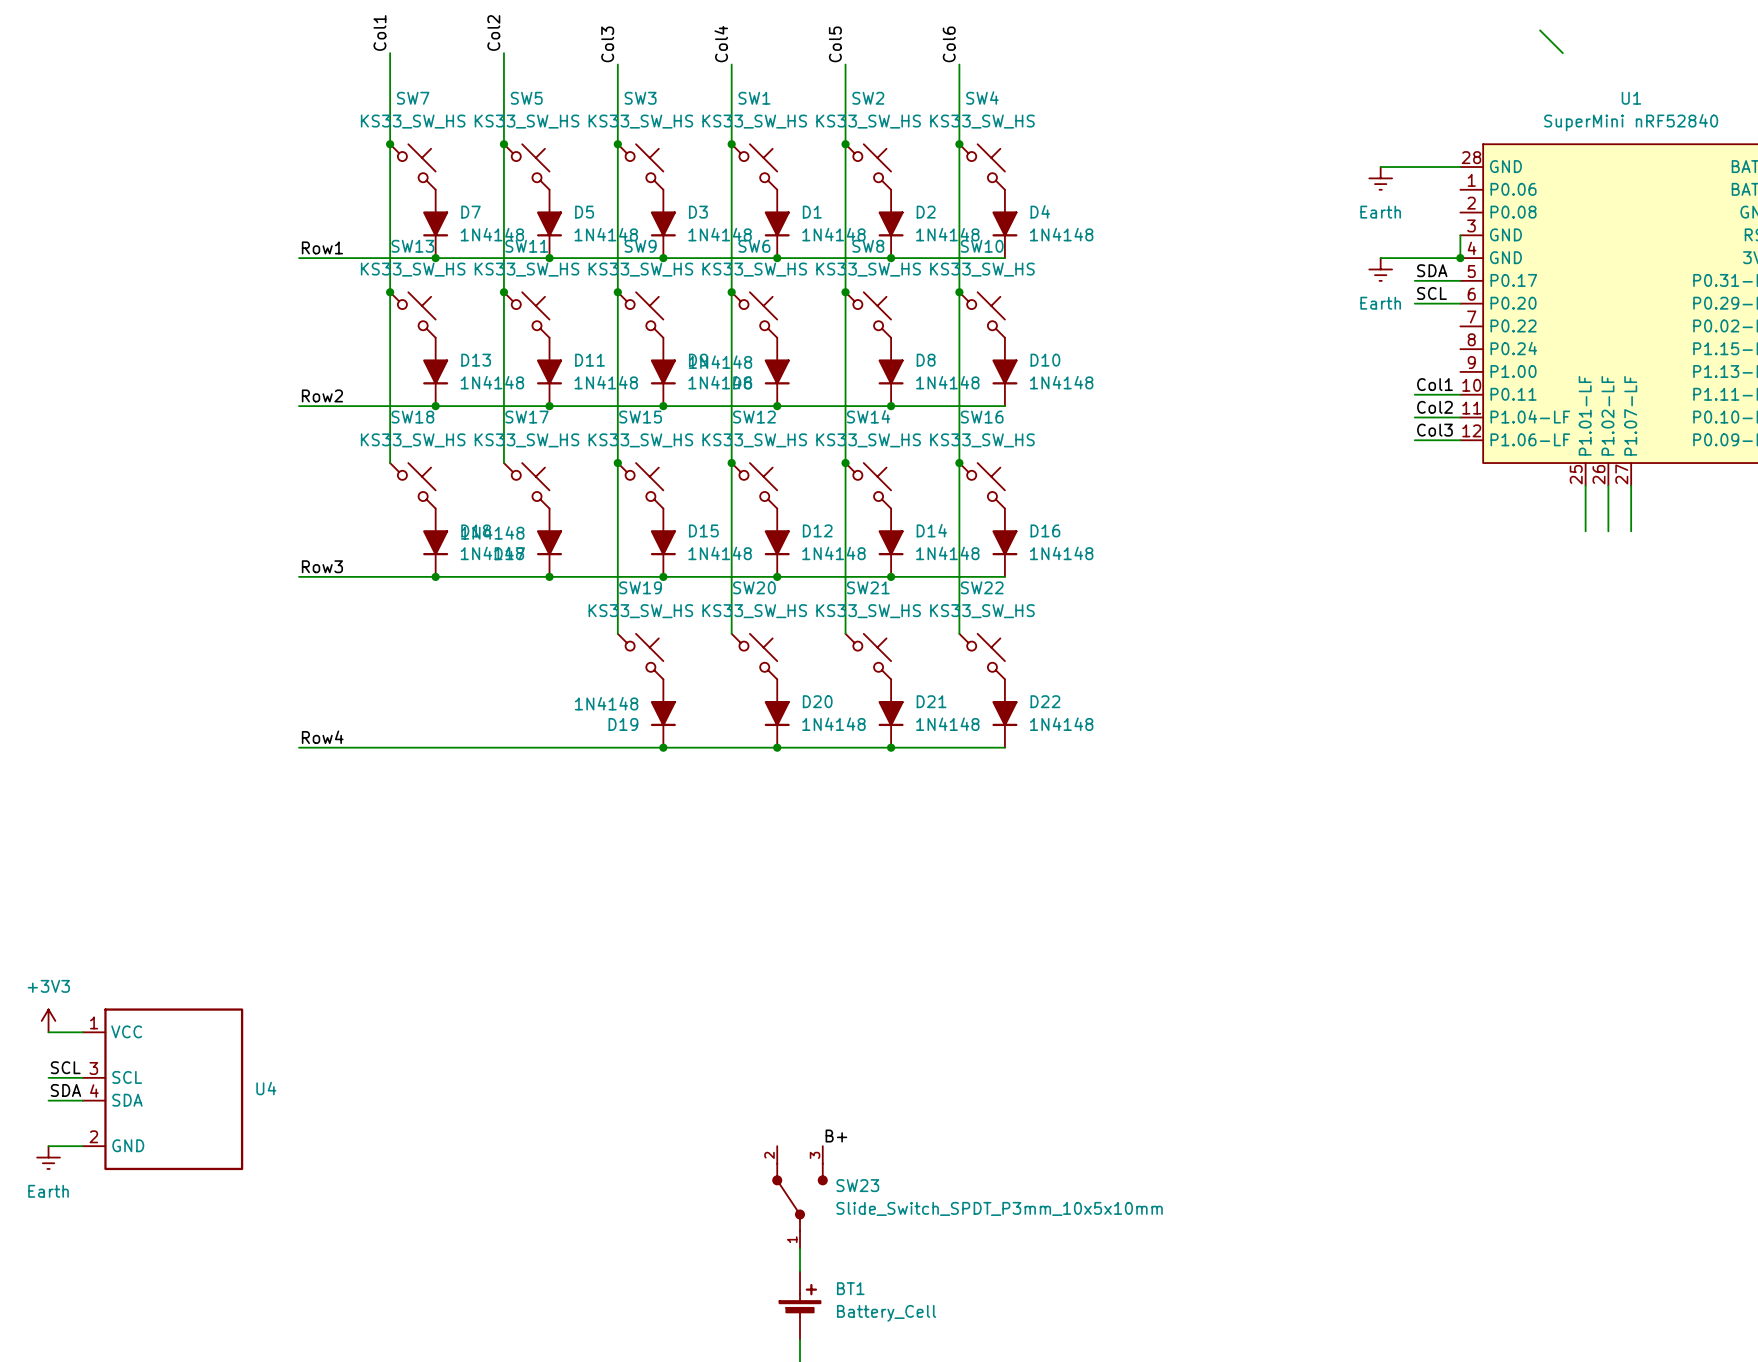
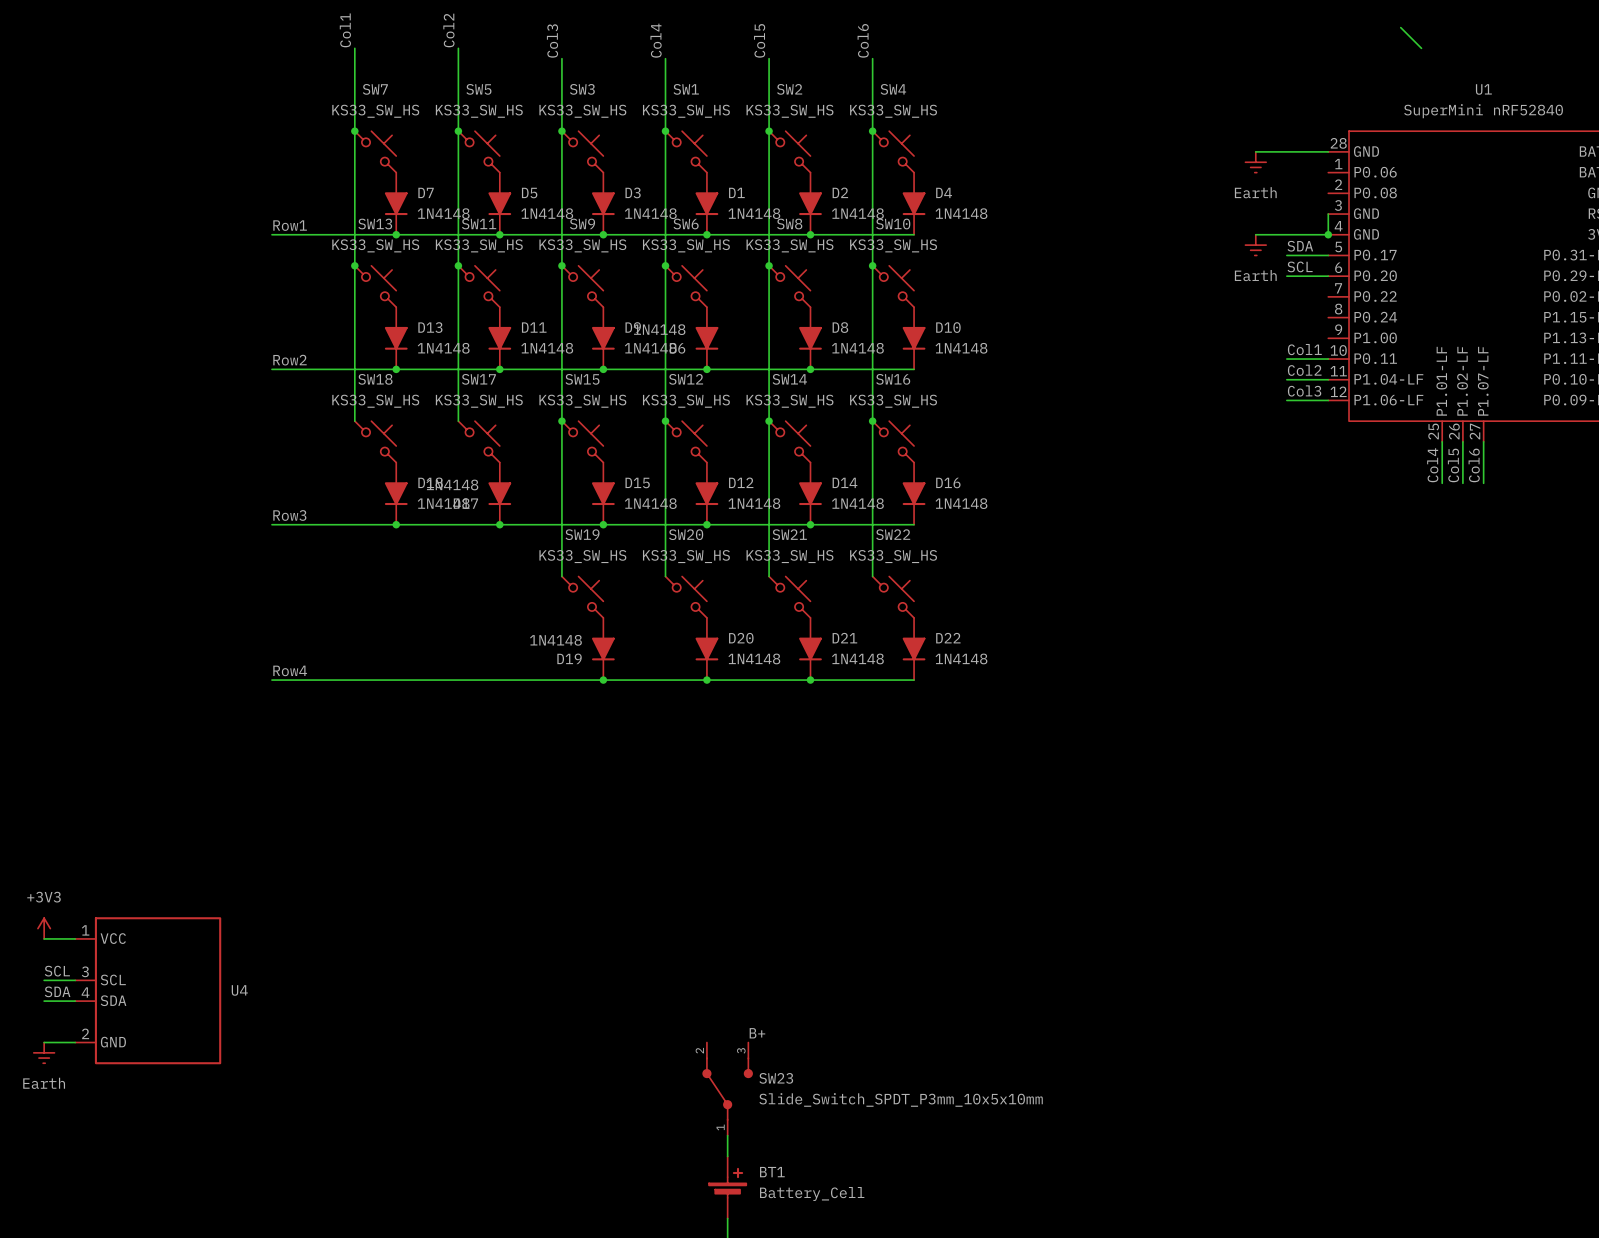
label: none -> Col4 (1432, 465)
label: none -> Col5 (1453, 465)
label: none -> Col6 (1474, 465)

